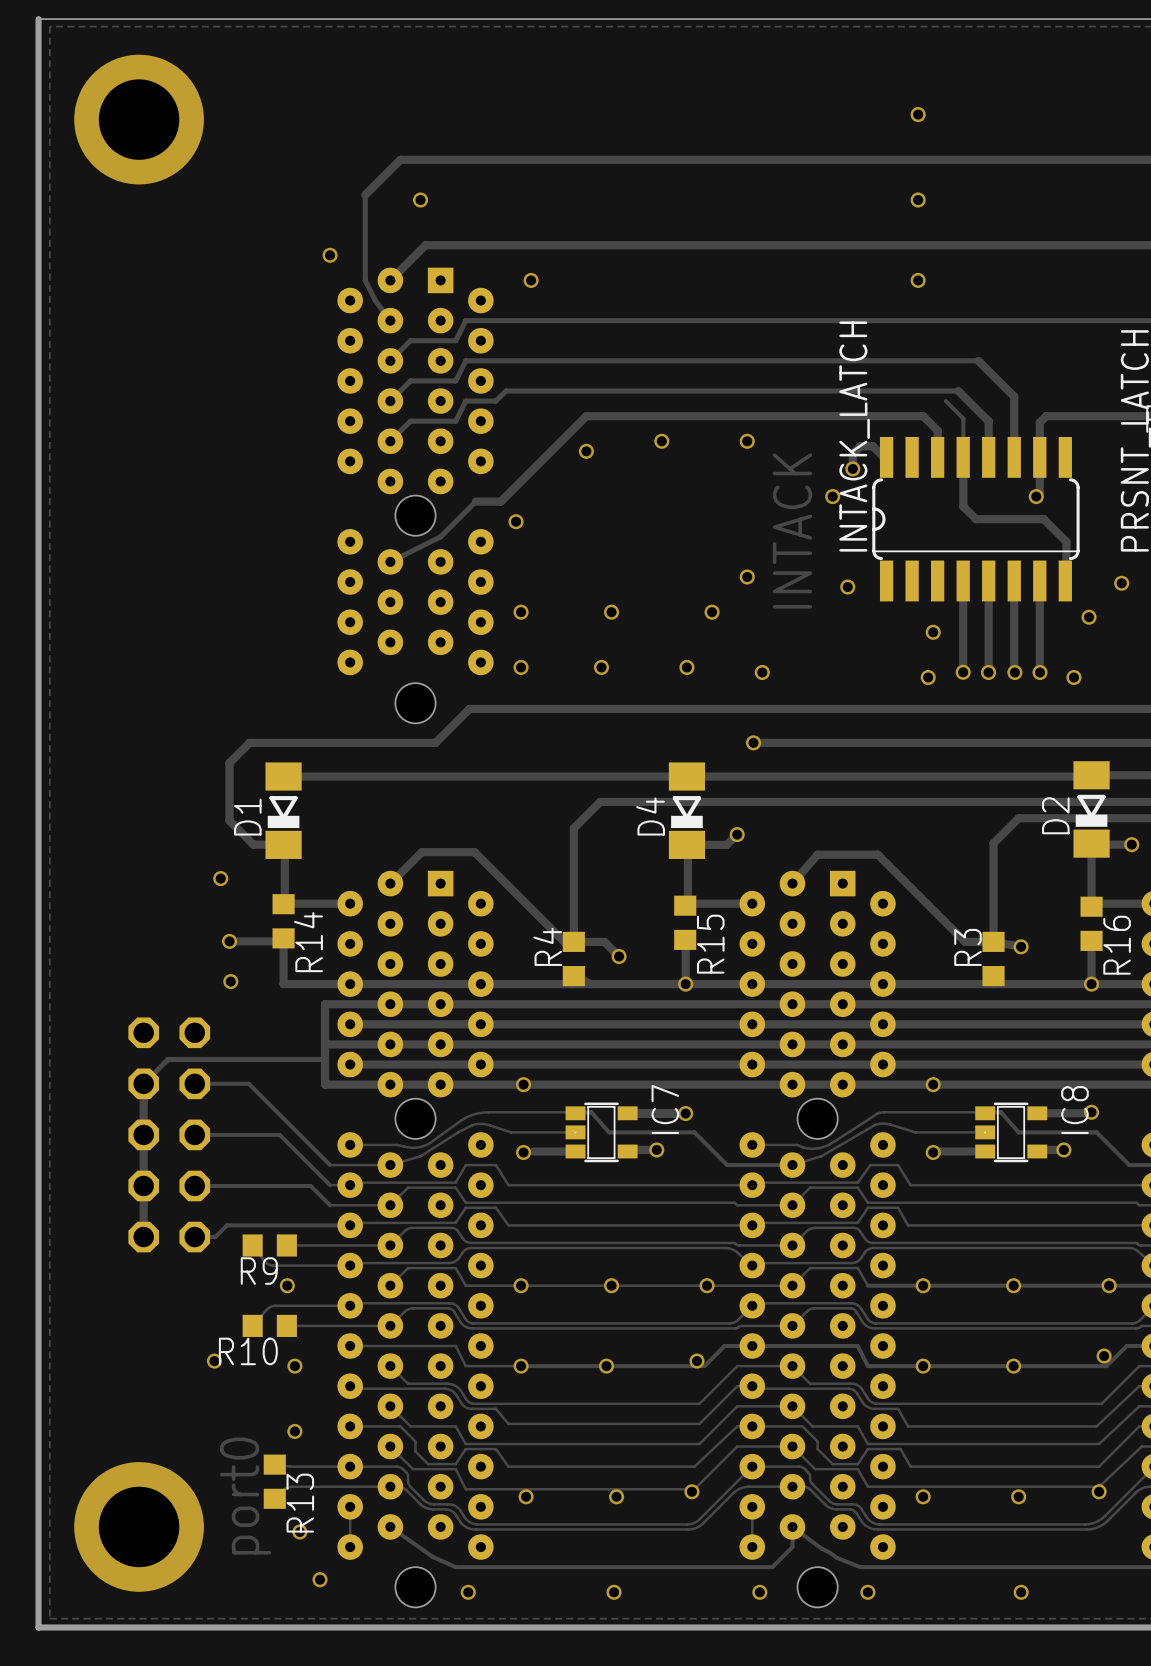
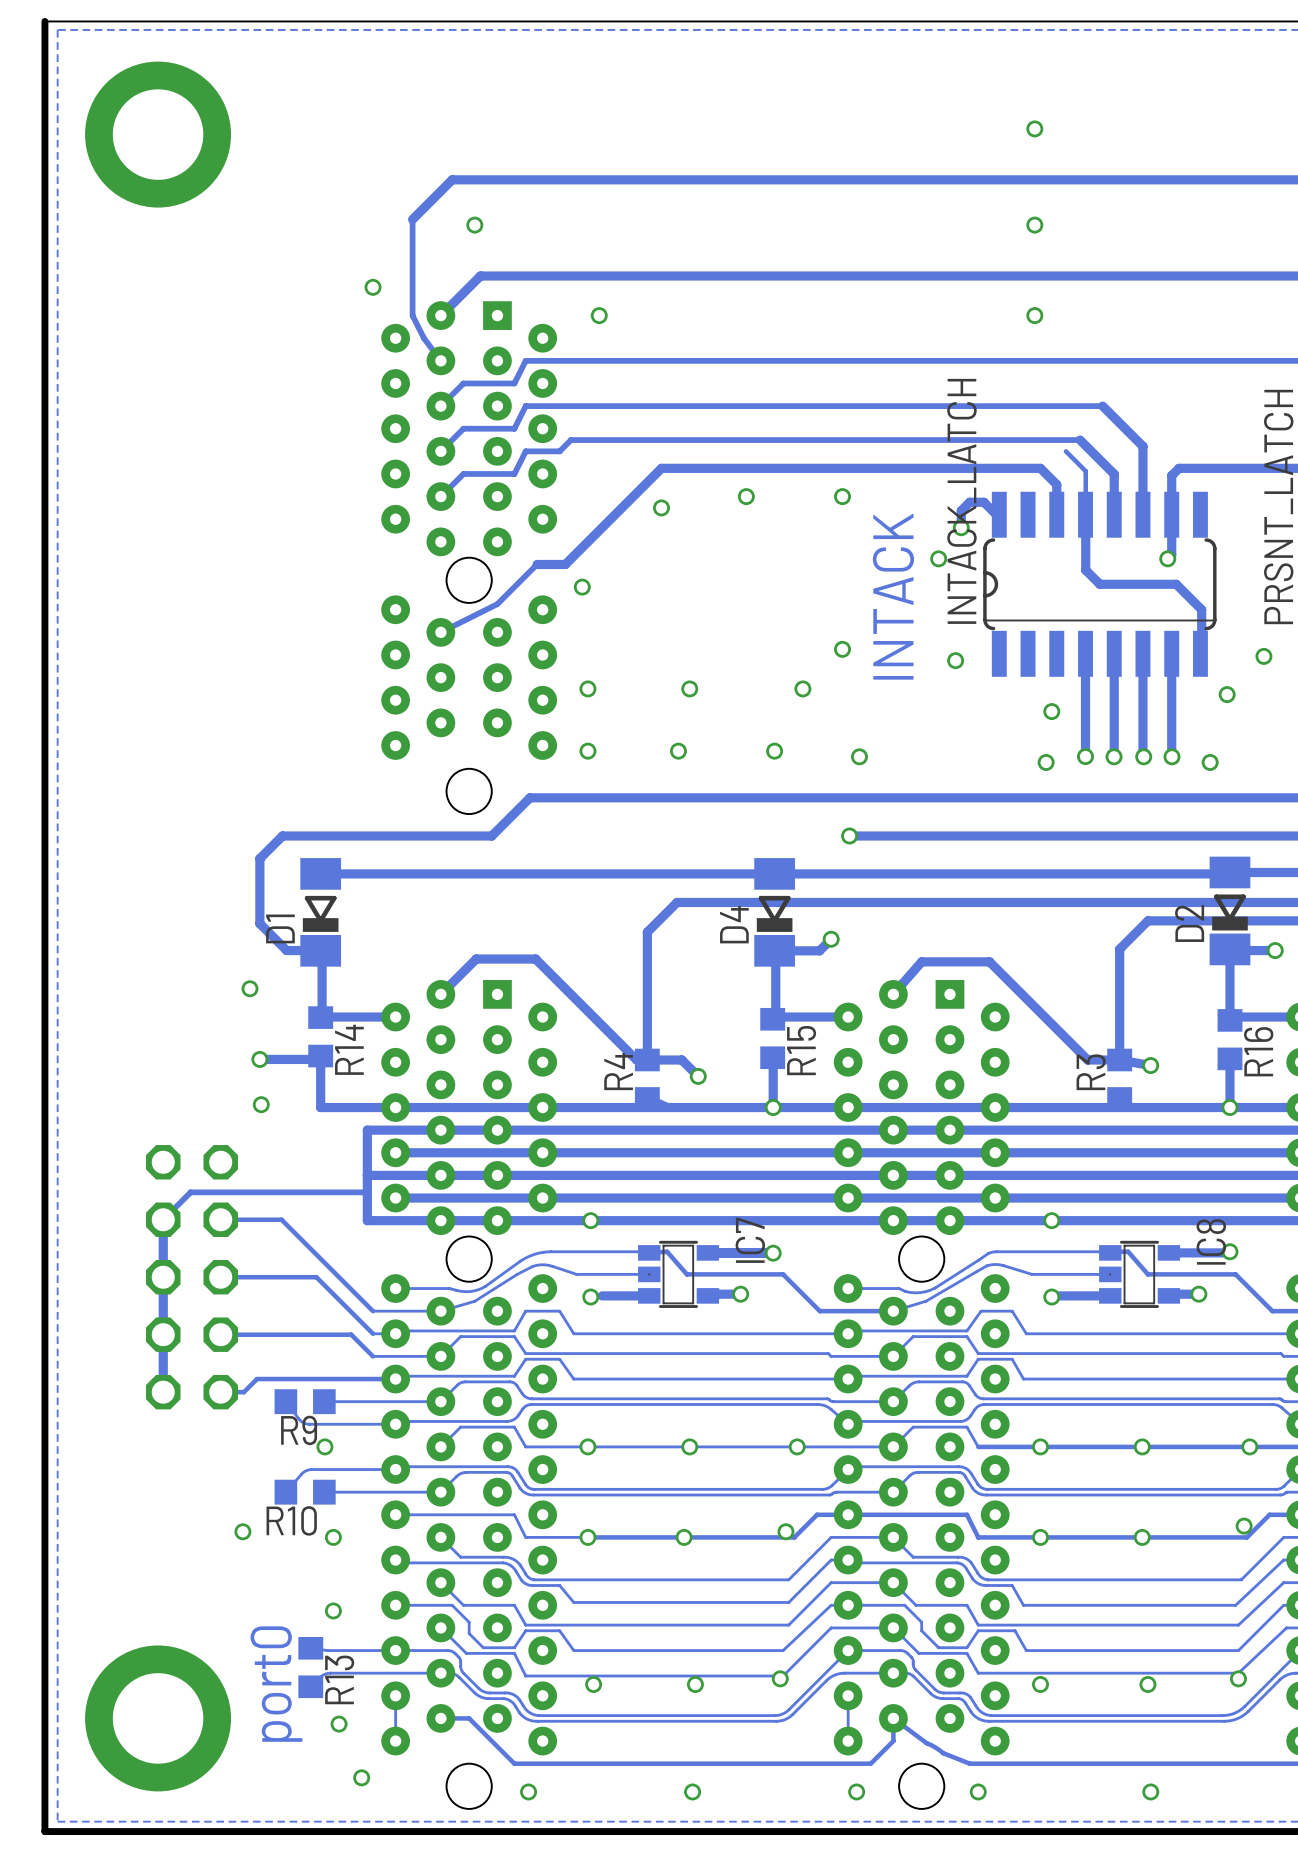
track: (390, 1526) (433, 1557) (455, 1567) -> (440, 1718) (469, 1718) (514, 1763)

